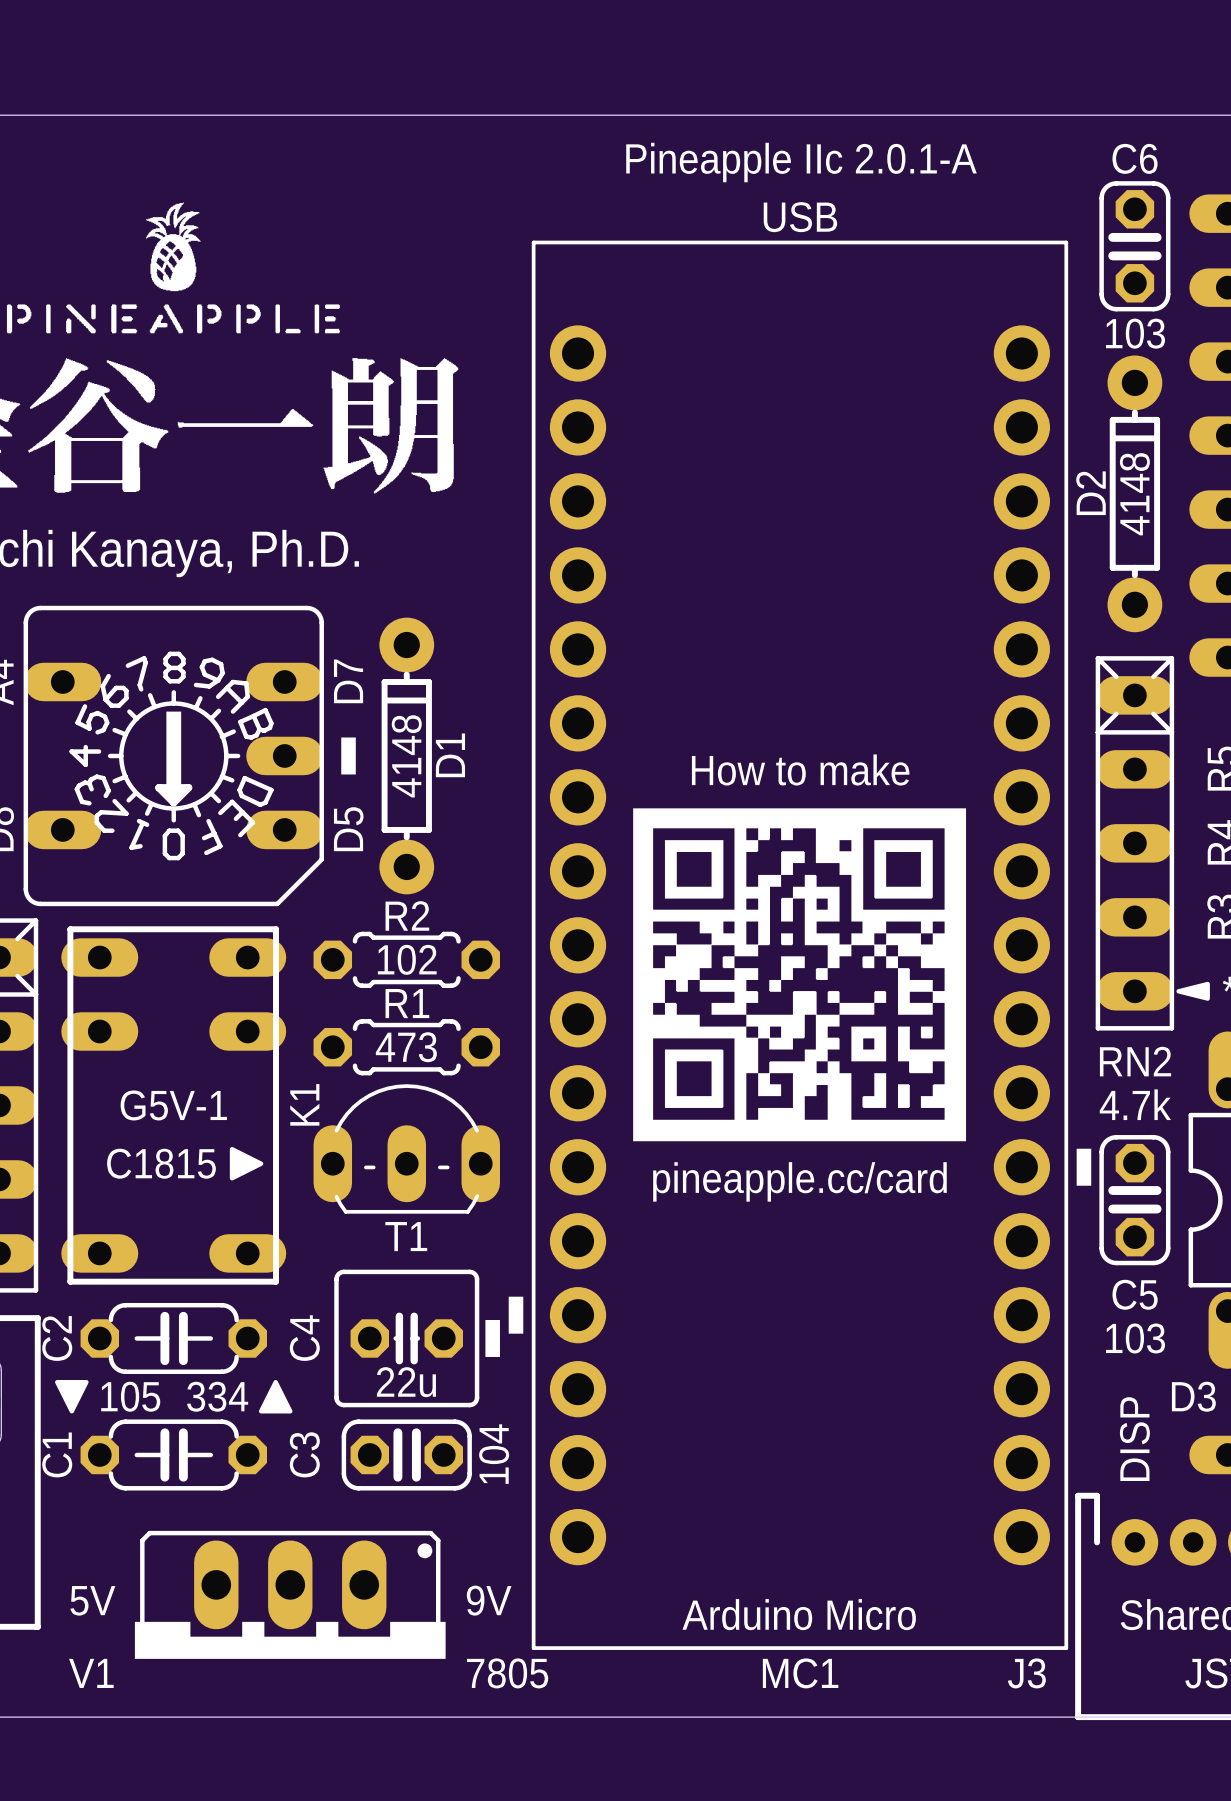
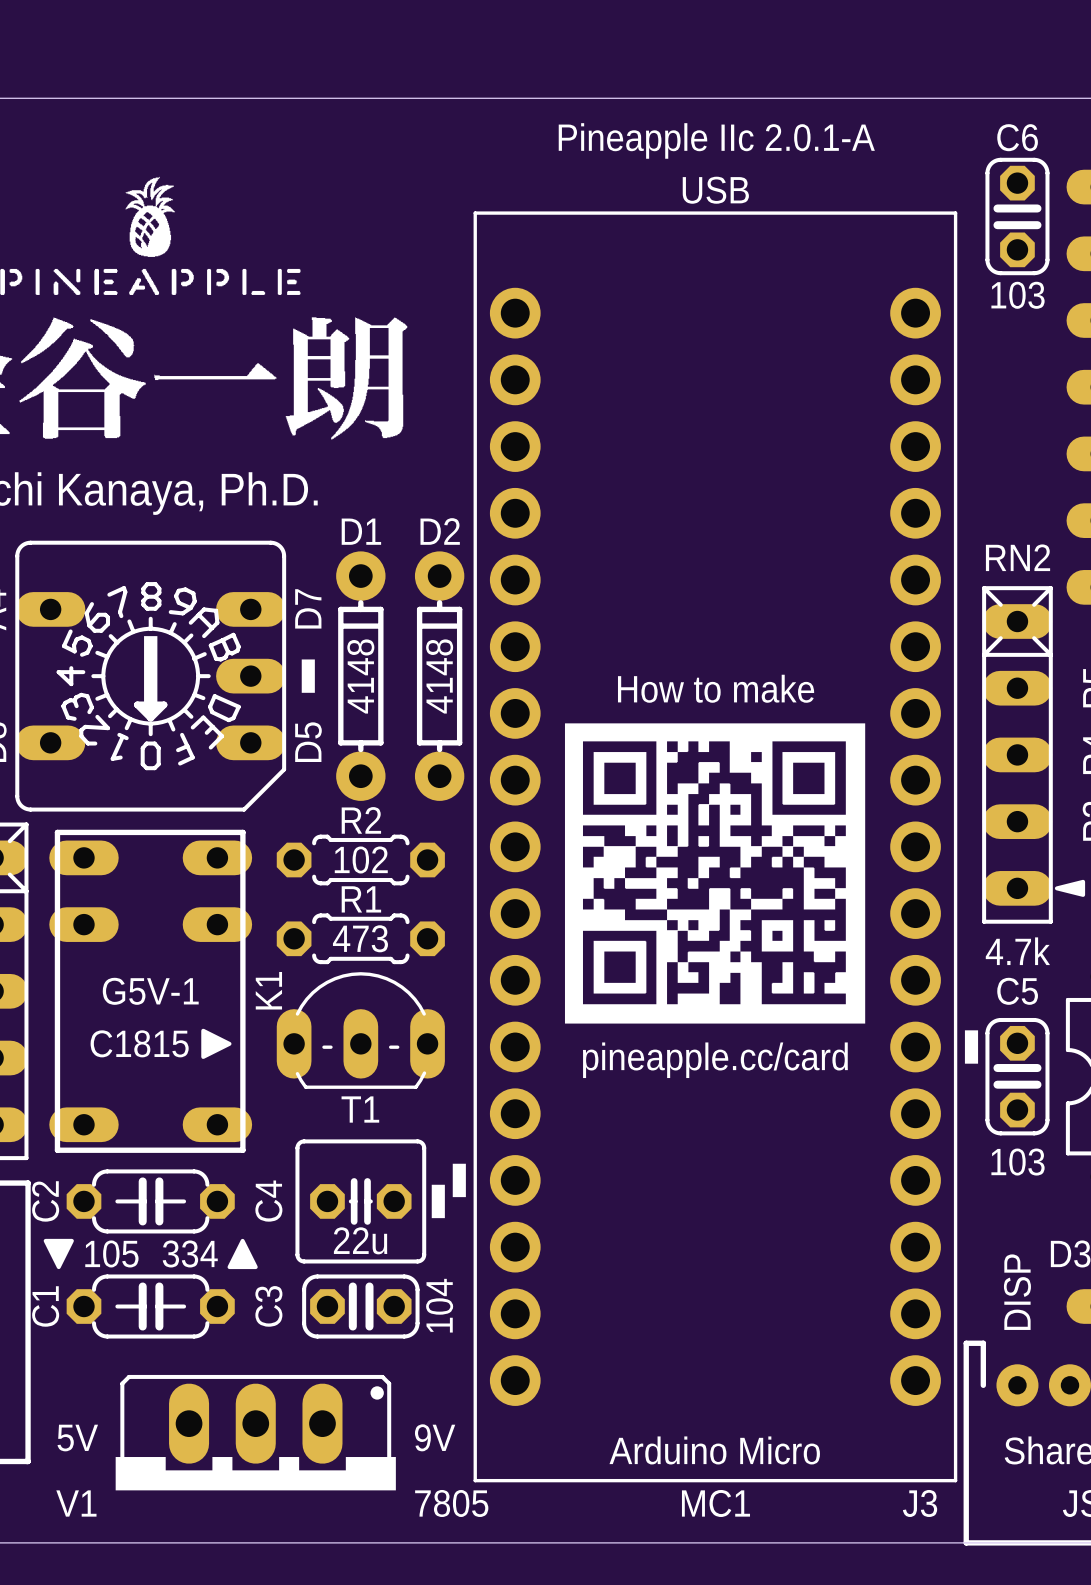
D2 name rotation: 0° (1091, 493) -> 90° clockwise (440, 531)
D2 name position: D2 (1091, 493) -> D2 (440, 531)
D2 position: (1134, 493) -> (439, 676)
text position: 4148 (1134, 494) -> 4148 (439, 676)
D1 name rotation: 0° (450, 755) -> 90° clockwise (361, 531)
D1 name position: D1 (450, 755) -> D1 (361, 531)
RN2 name position: RN2 (1135, 1061) -> RN2 (1018, 557)
text position: 4.7k (1135, 1104) -> 4.7k (1017, 951)
C5 name position: C5 (1135, 1294) -> C5 (1017, 991)
text position: 103 (1135, 1338) -> 103 (1018, 1162)

